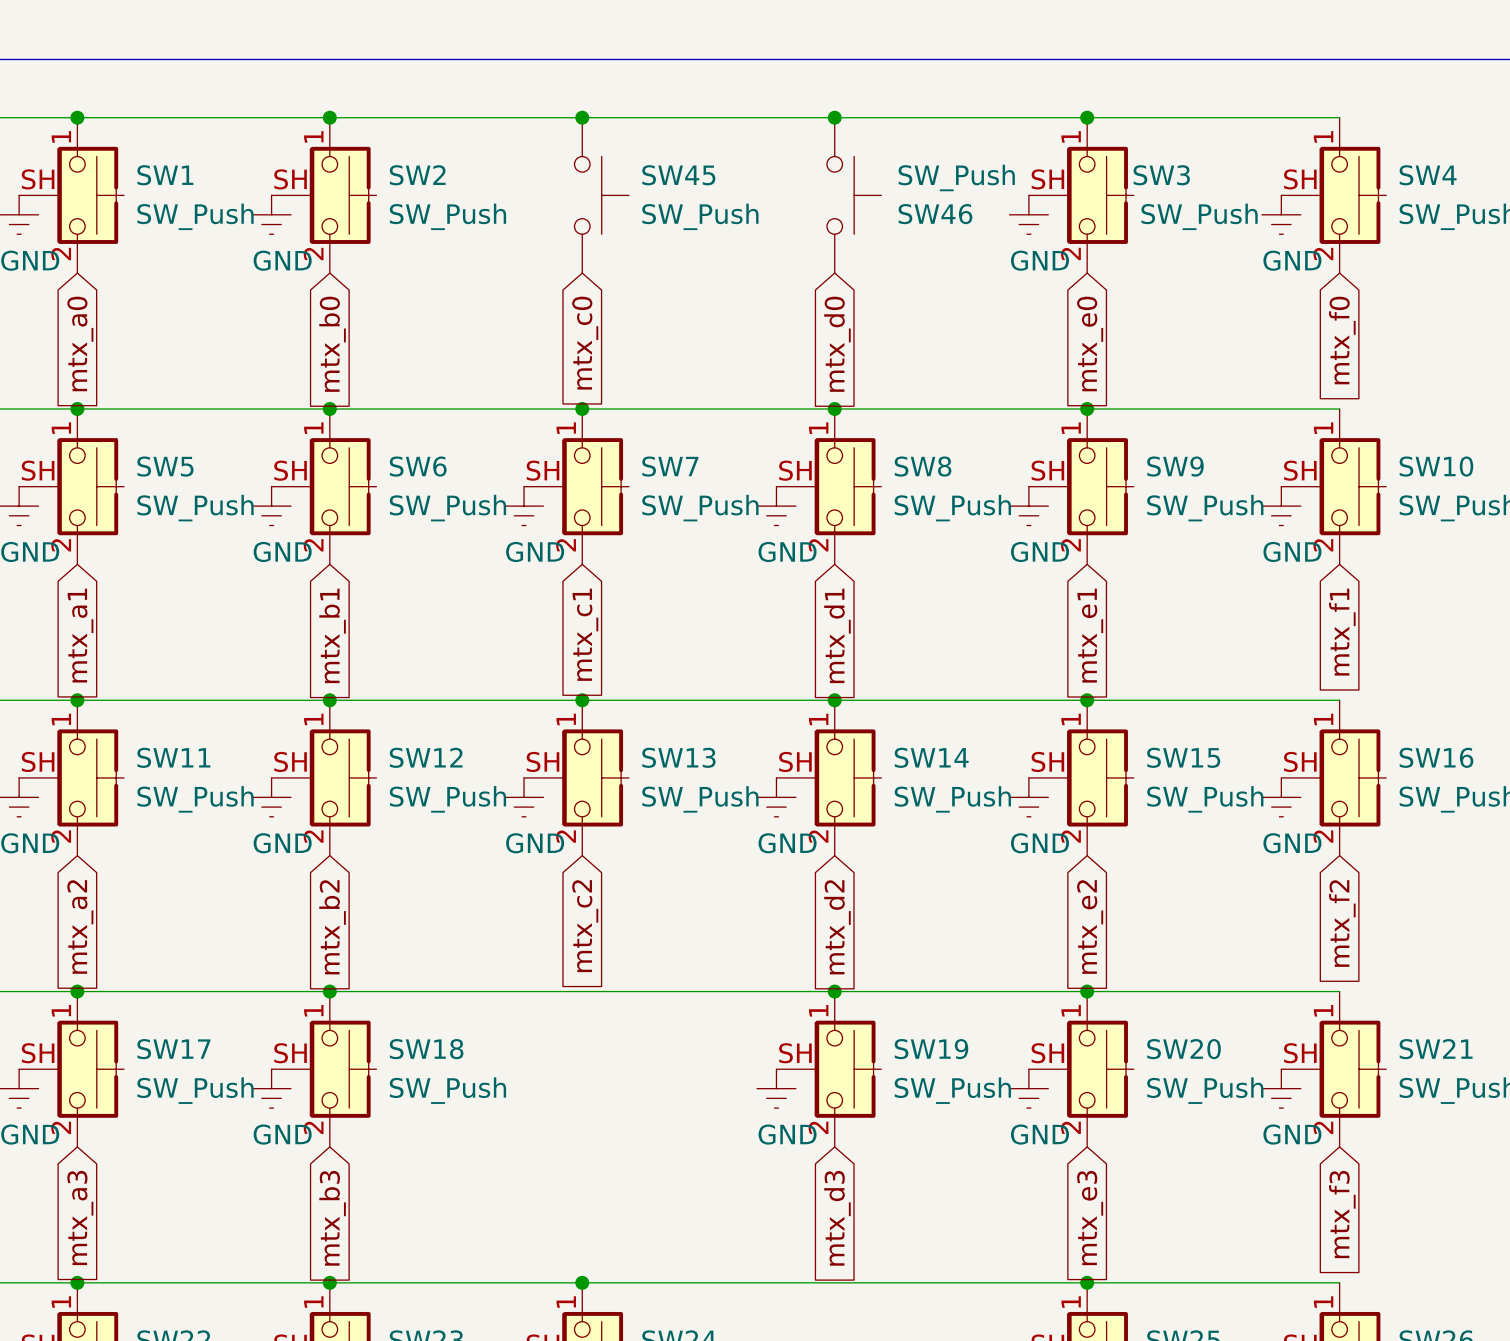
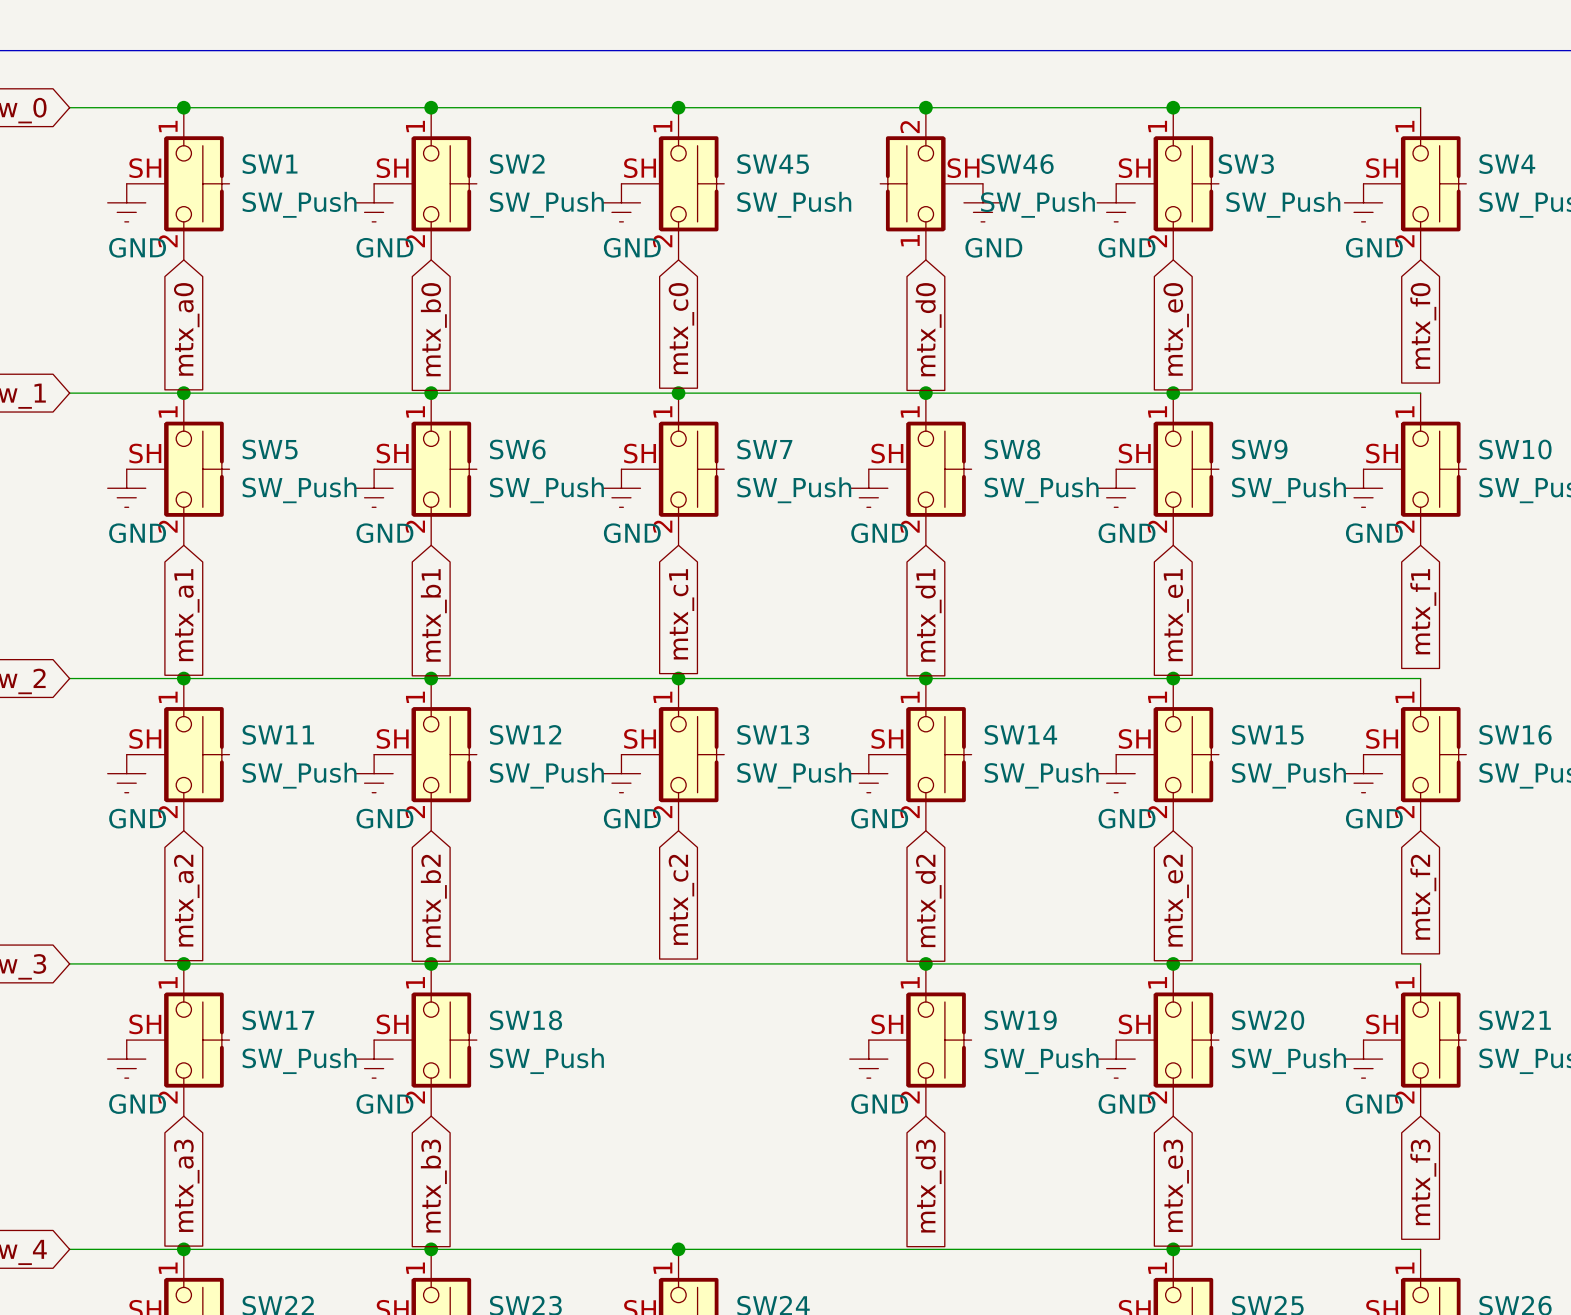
SW45 symbol: [574, 117, 629, 274] -> [621, 107, 725, 260]
SW46 symbol: [826, 117, 882, 274] -> [880, 107, 983, 260]
SW46 value position: SW_Push (956, 177) -> SW_Push (1037, 204)
power symbol: none -> GND (621, 202)
power symbol: none -> GND (982, 202)
SW46 name position: SW46 (935, 214) -> SW46 (1017, 164)

